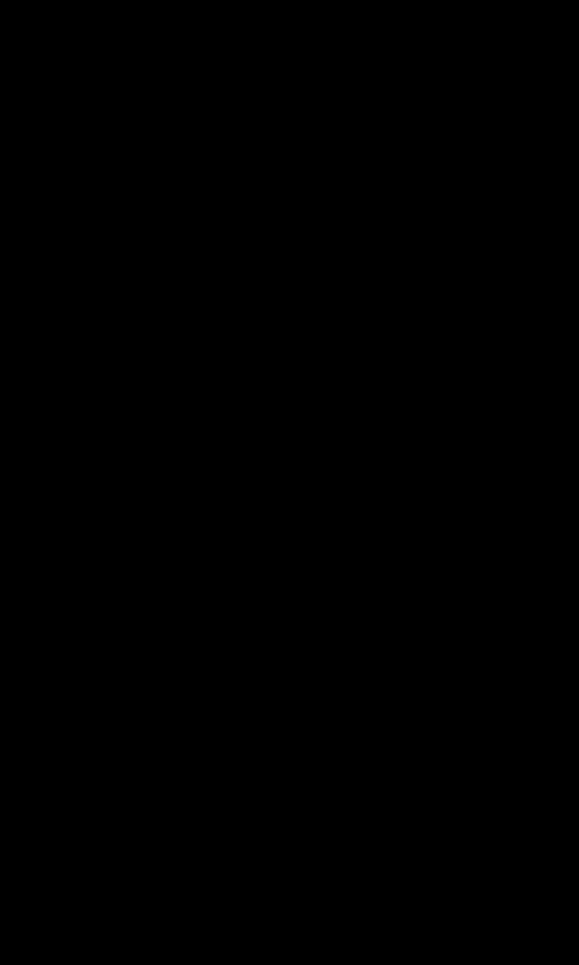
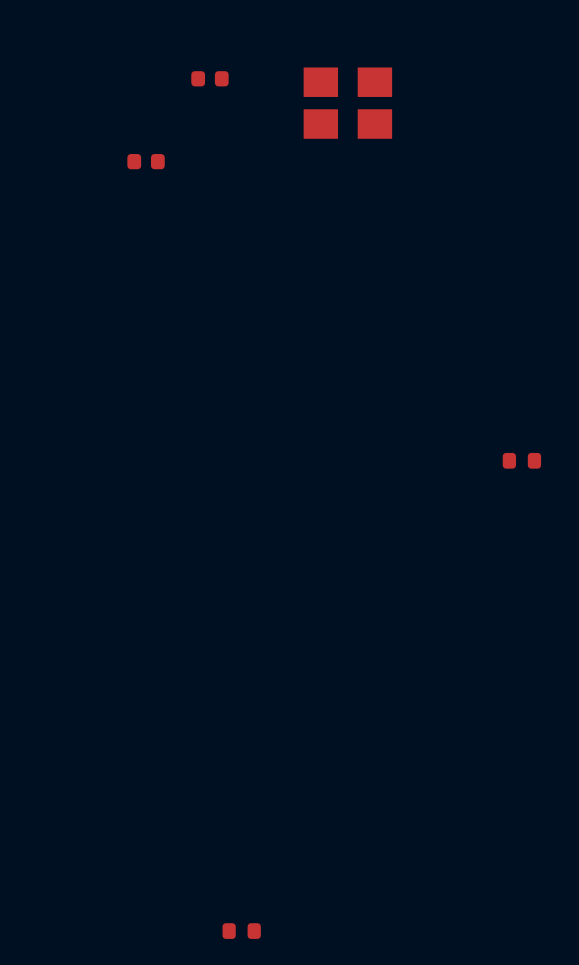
part: none -> (209, 78)
part: none -> (347, 103)
part: none -> (146, 161)
part: none -> (521, 460)
part: none -> (241, 931)

